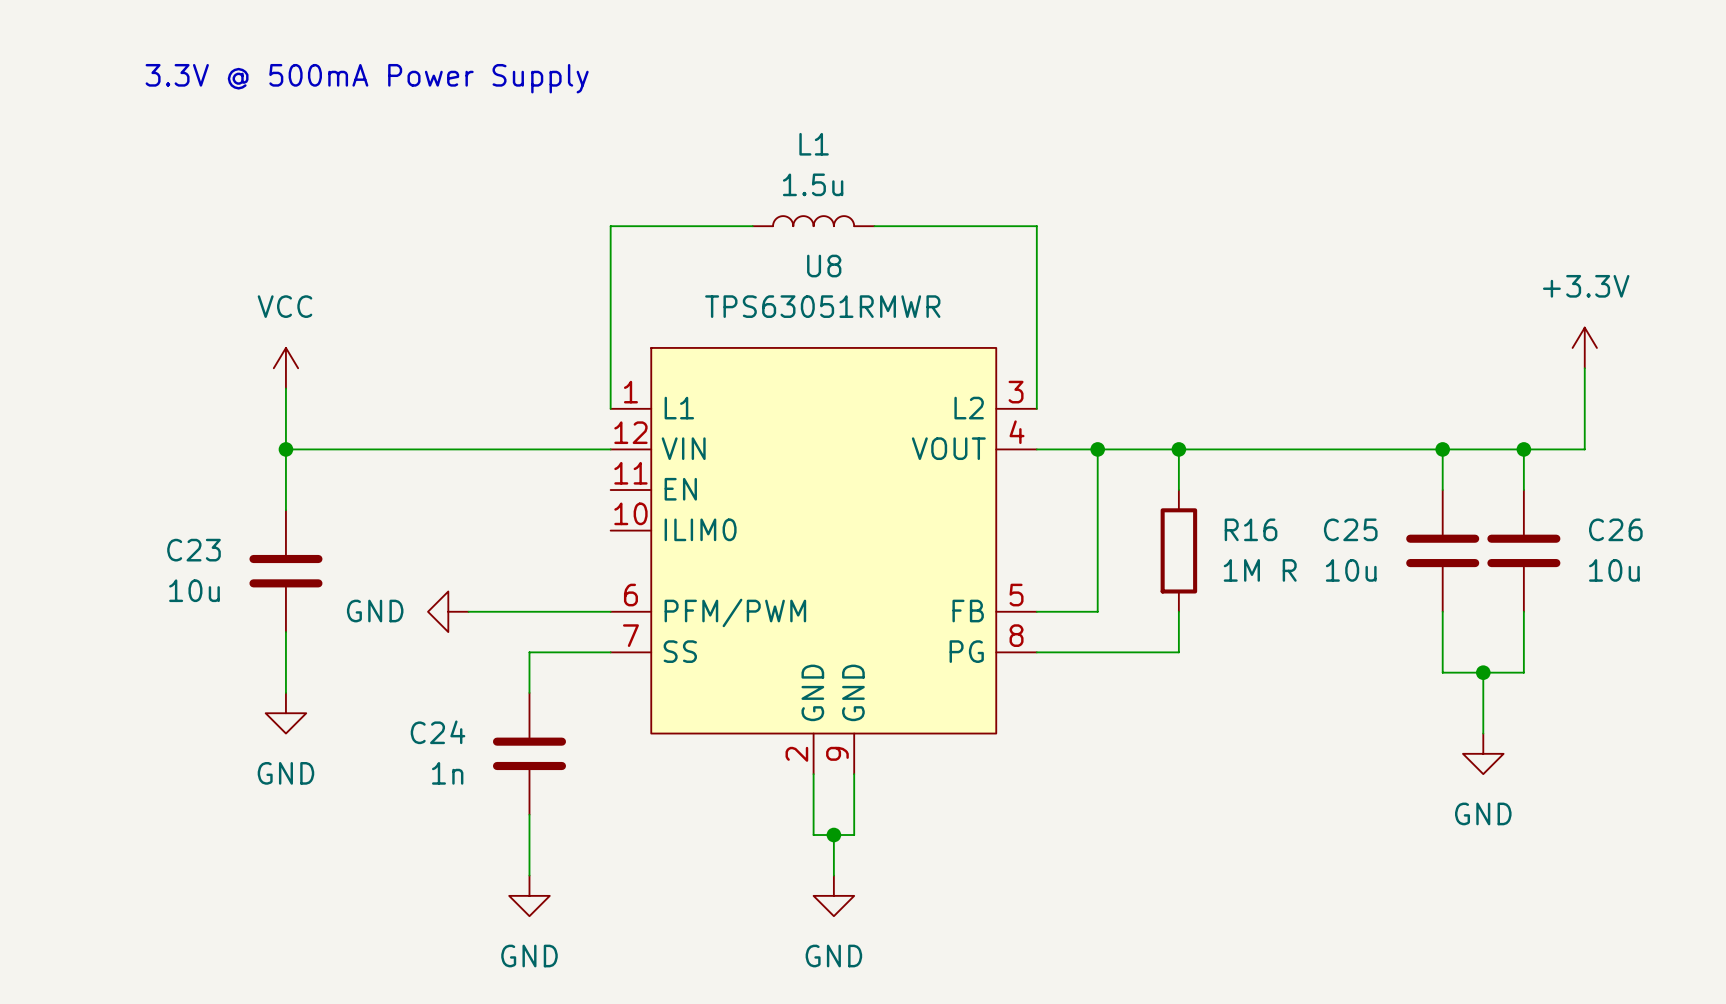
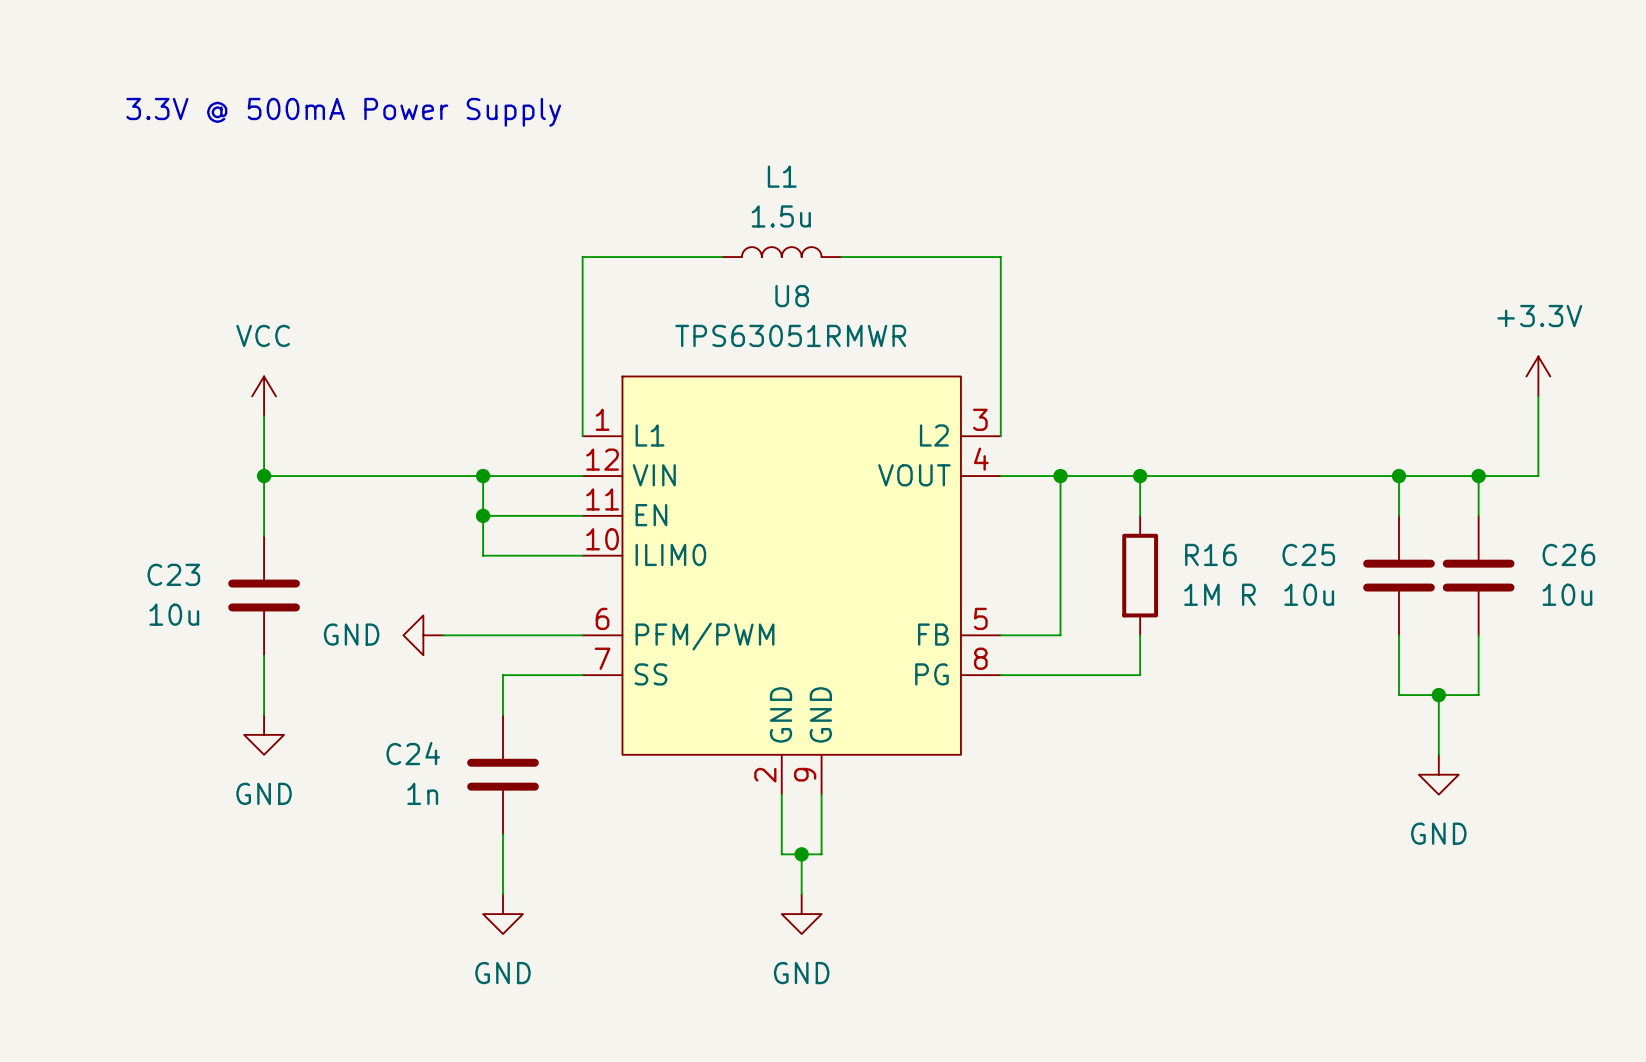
wire: none -> (483, 476) (483, 555) (582, 555)
junction: none -> (483, 476)
wire: none -> (483, 515) (582, 515)
junction: none -> (483, 515)

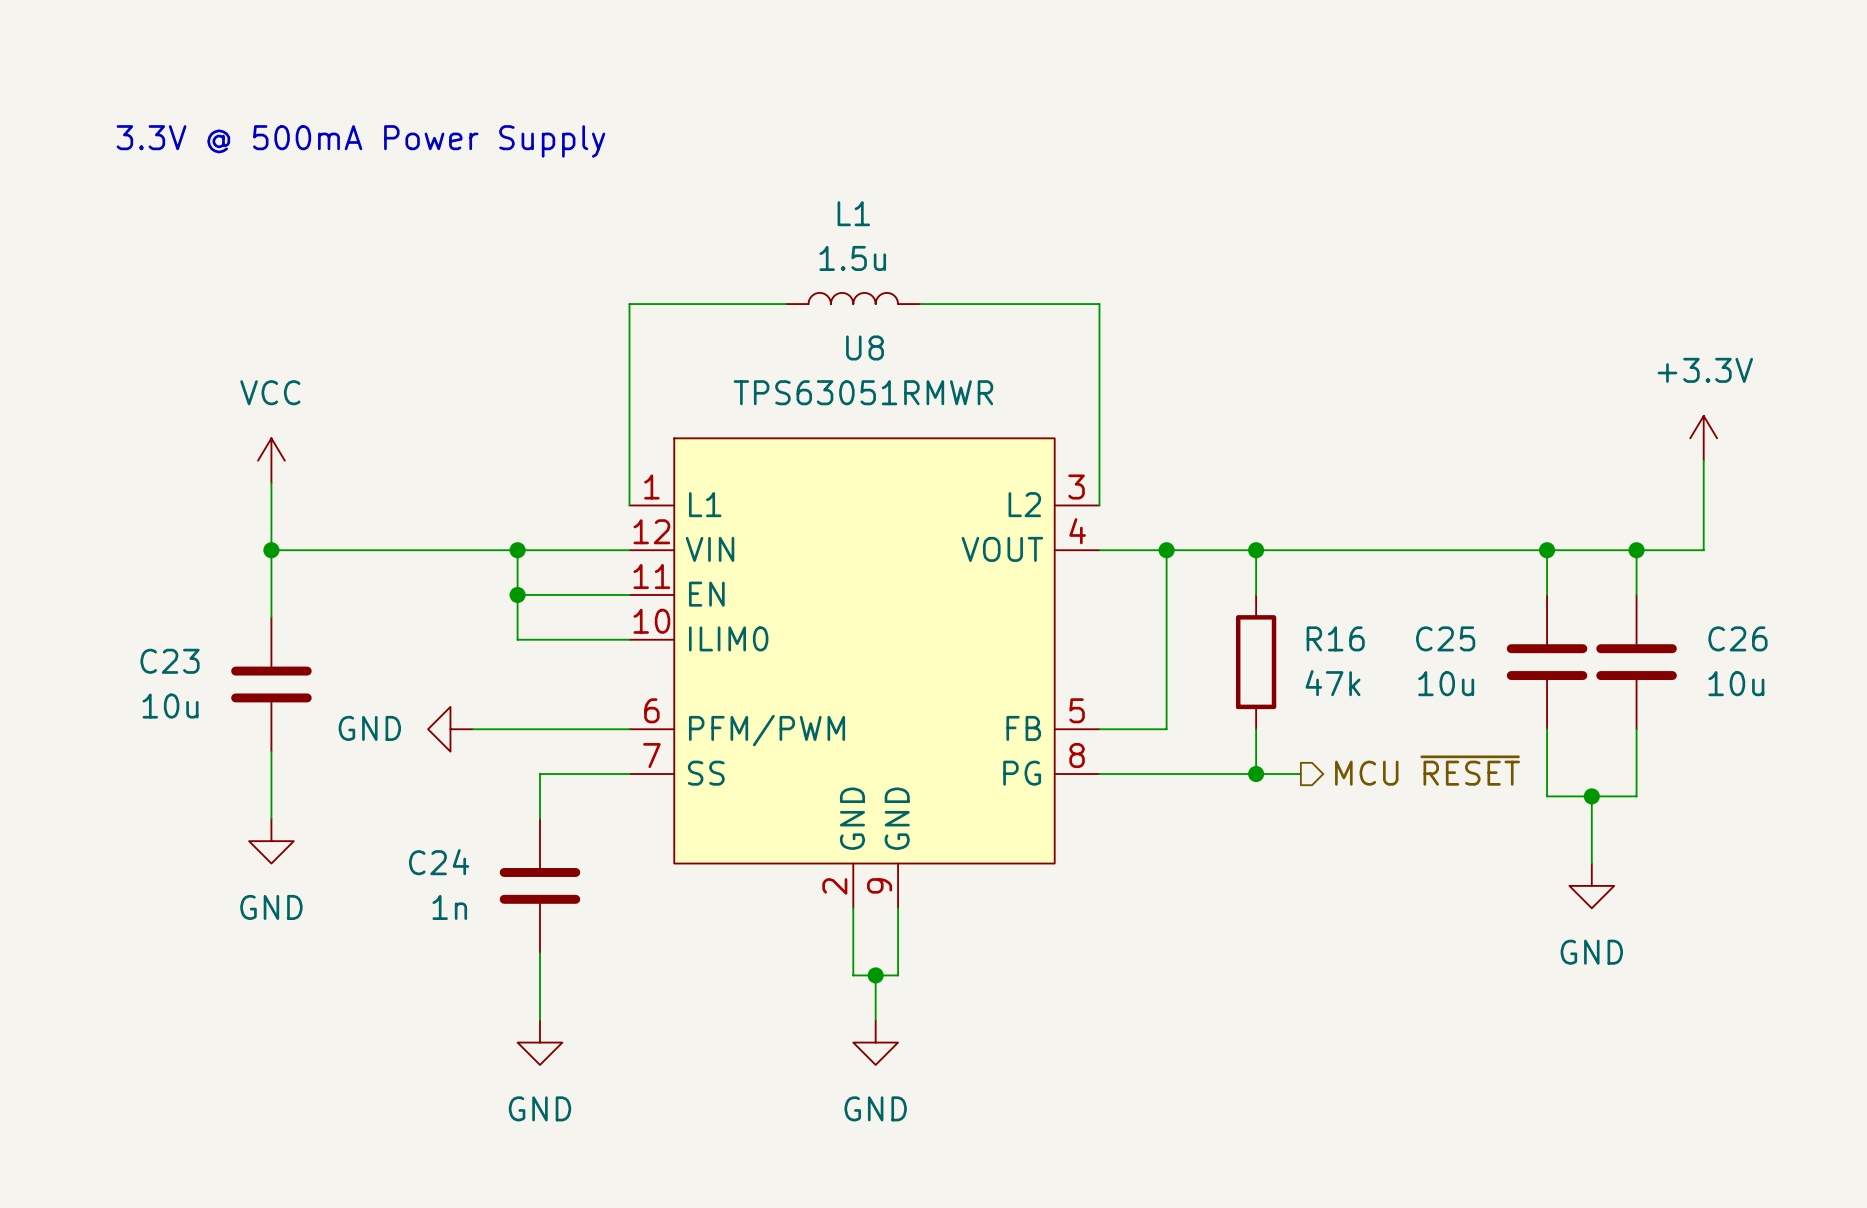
R16 value: 1M R (1219, 594) -> 47k (1333, 683)
hierarchical label: none -> MCU ~{RESET} (1427, 770)
wire: none -> (1256, 774) (1300, 774)
junction: none -> (1256, 774)

